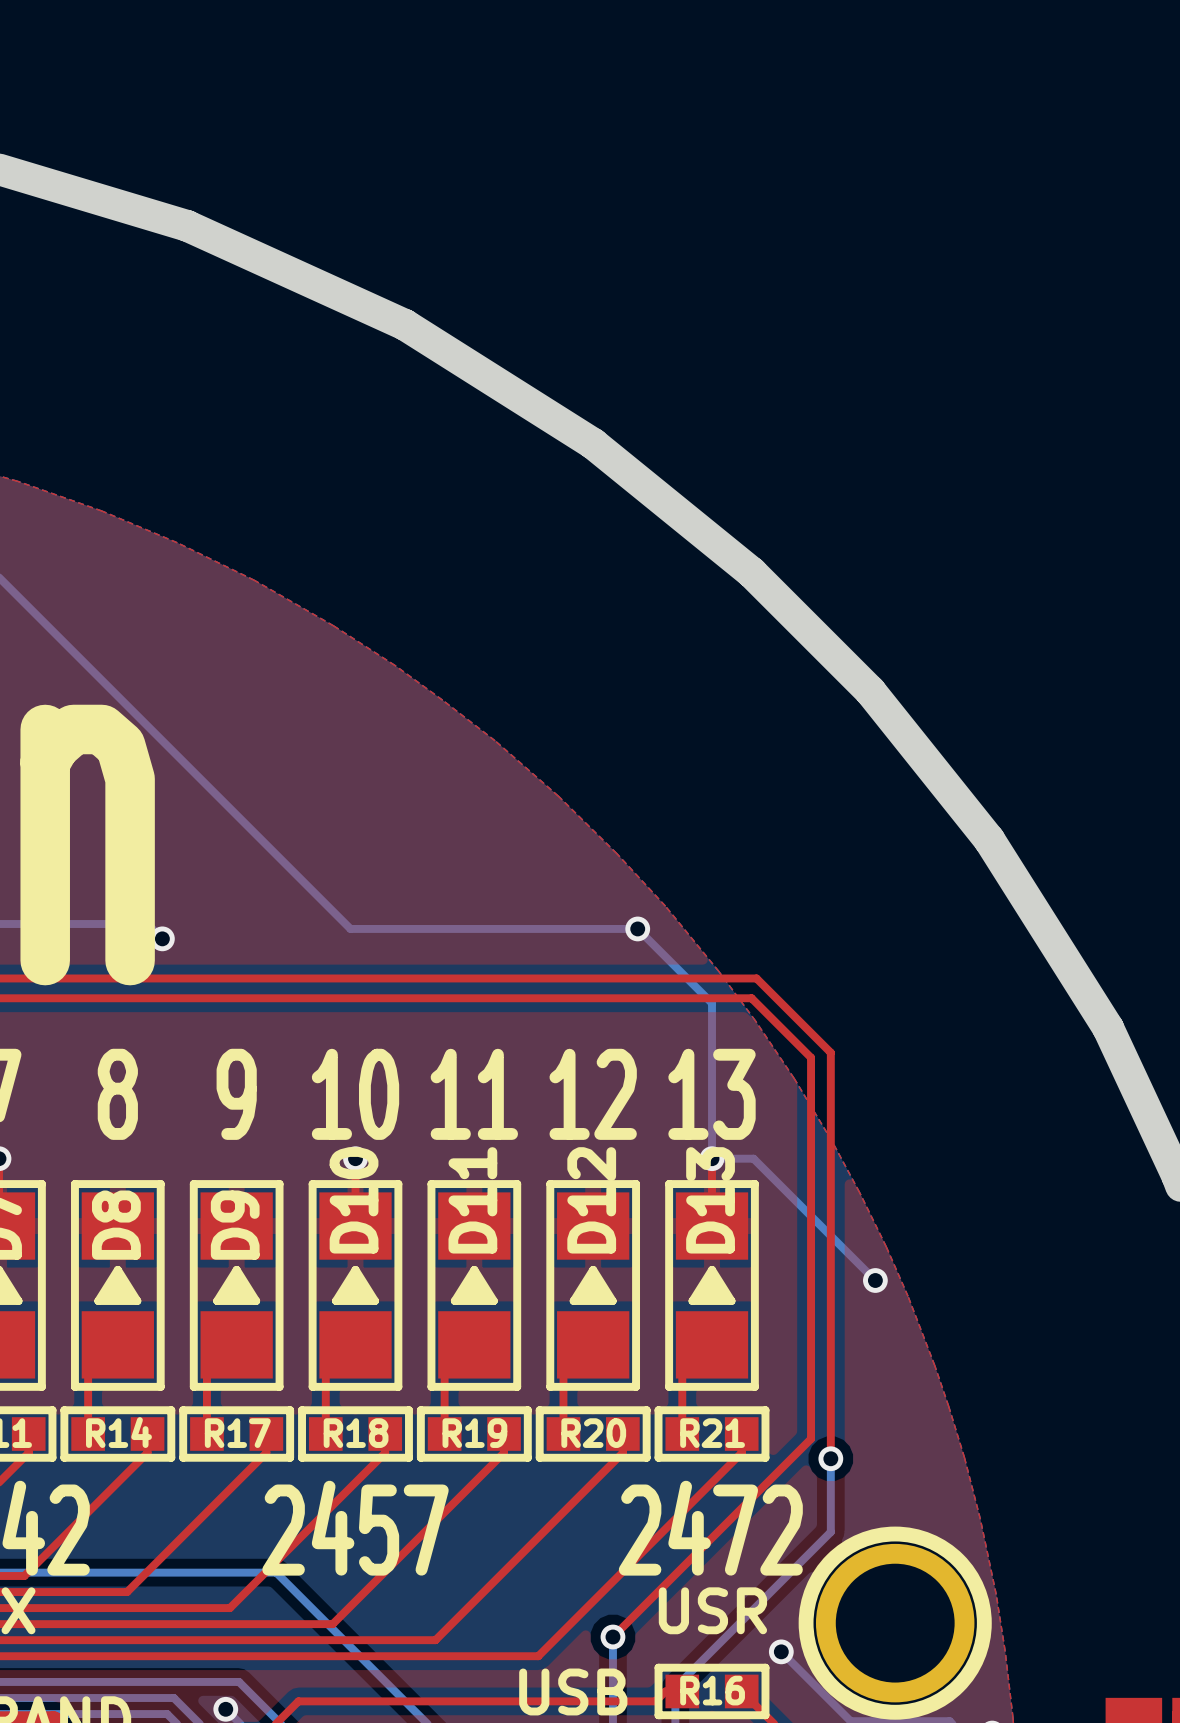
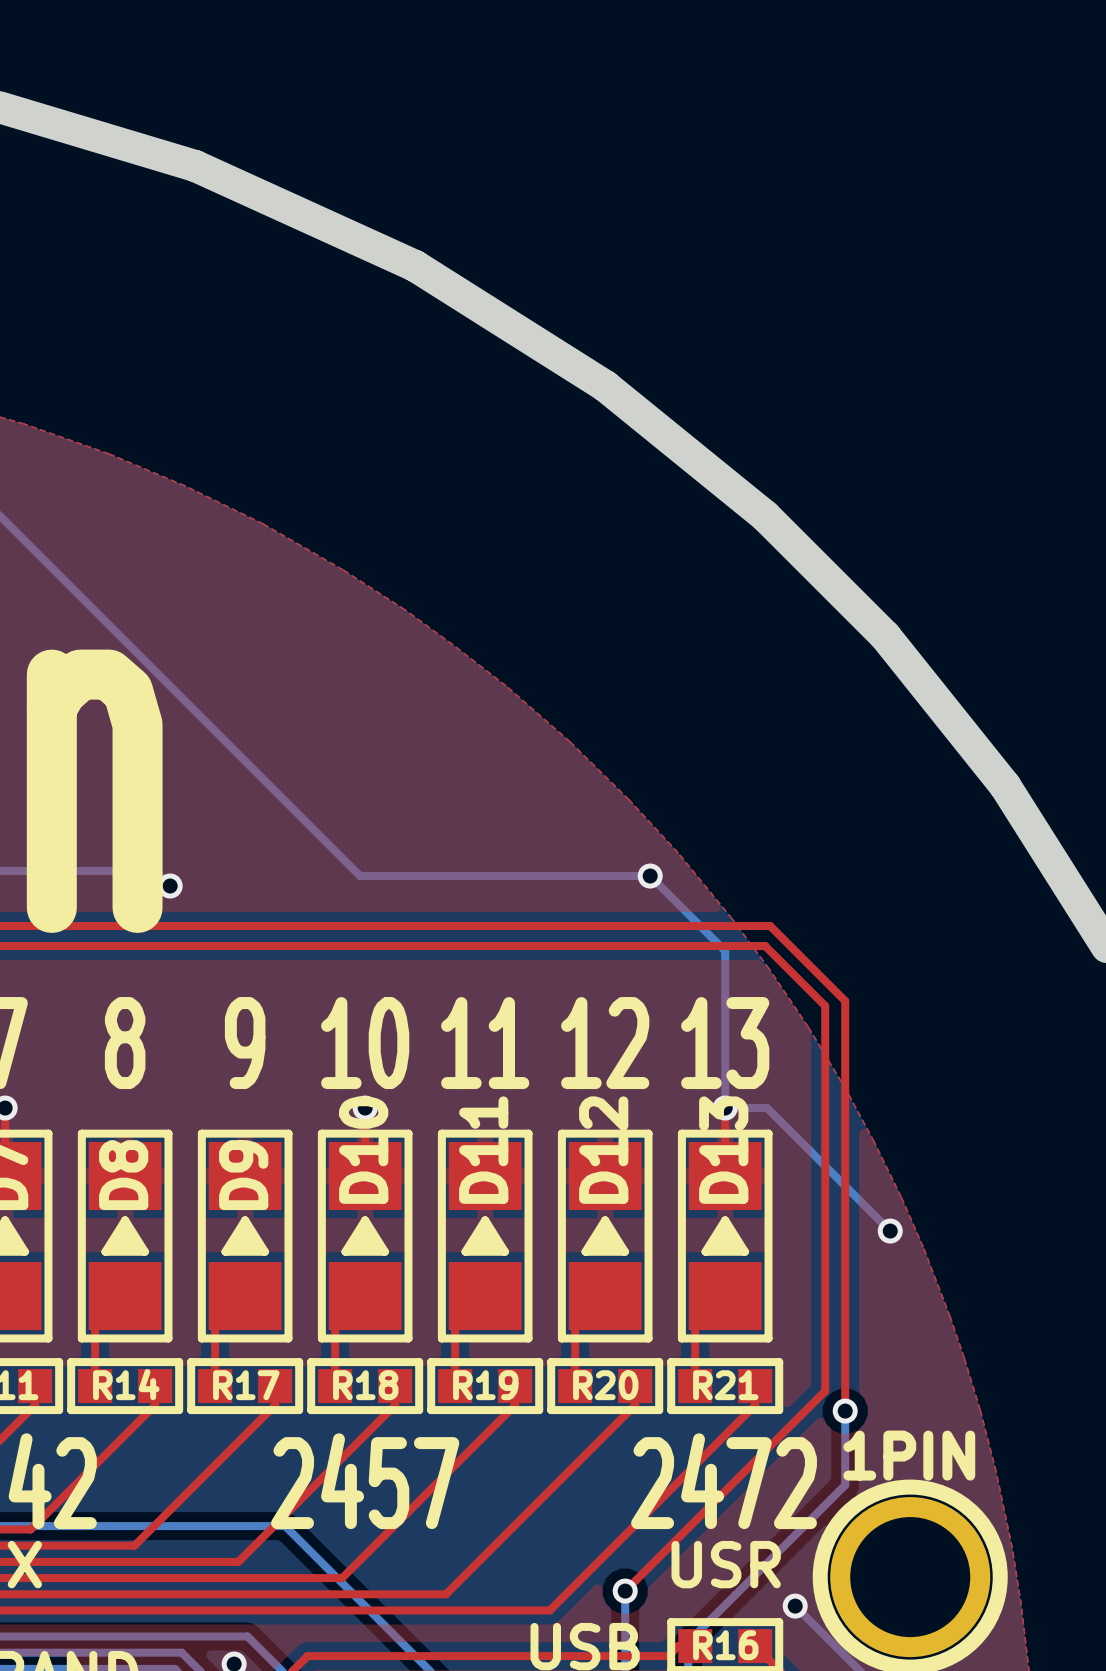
1PIN name: none -> 1PIN (909, 1455)

